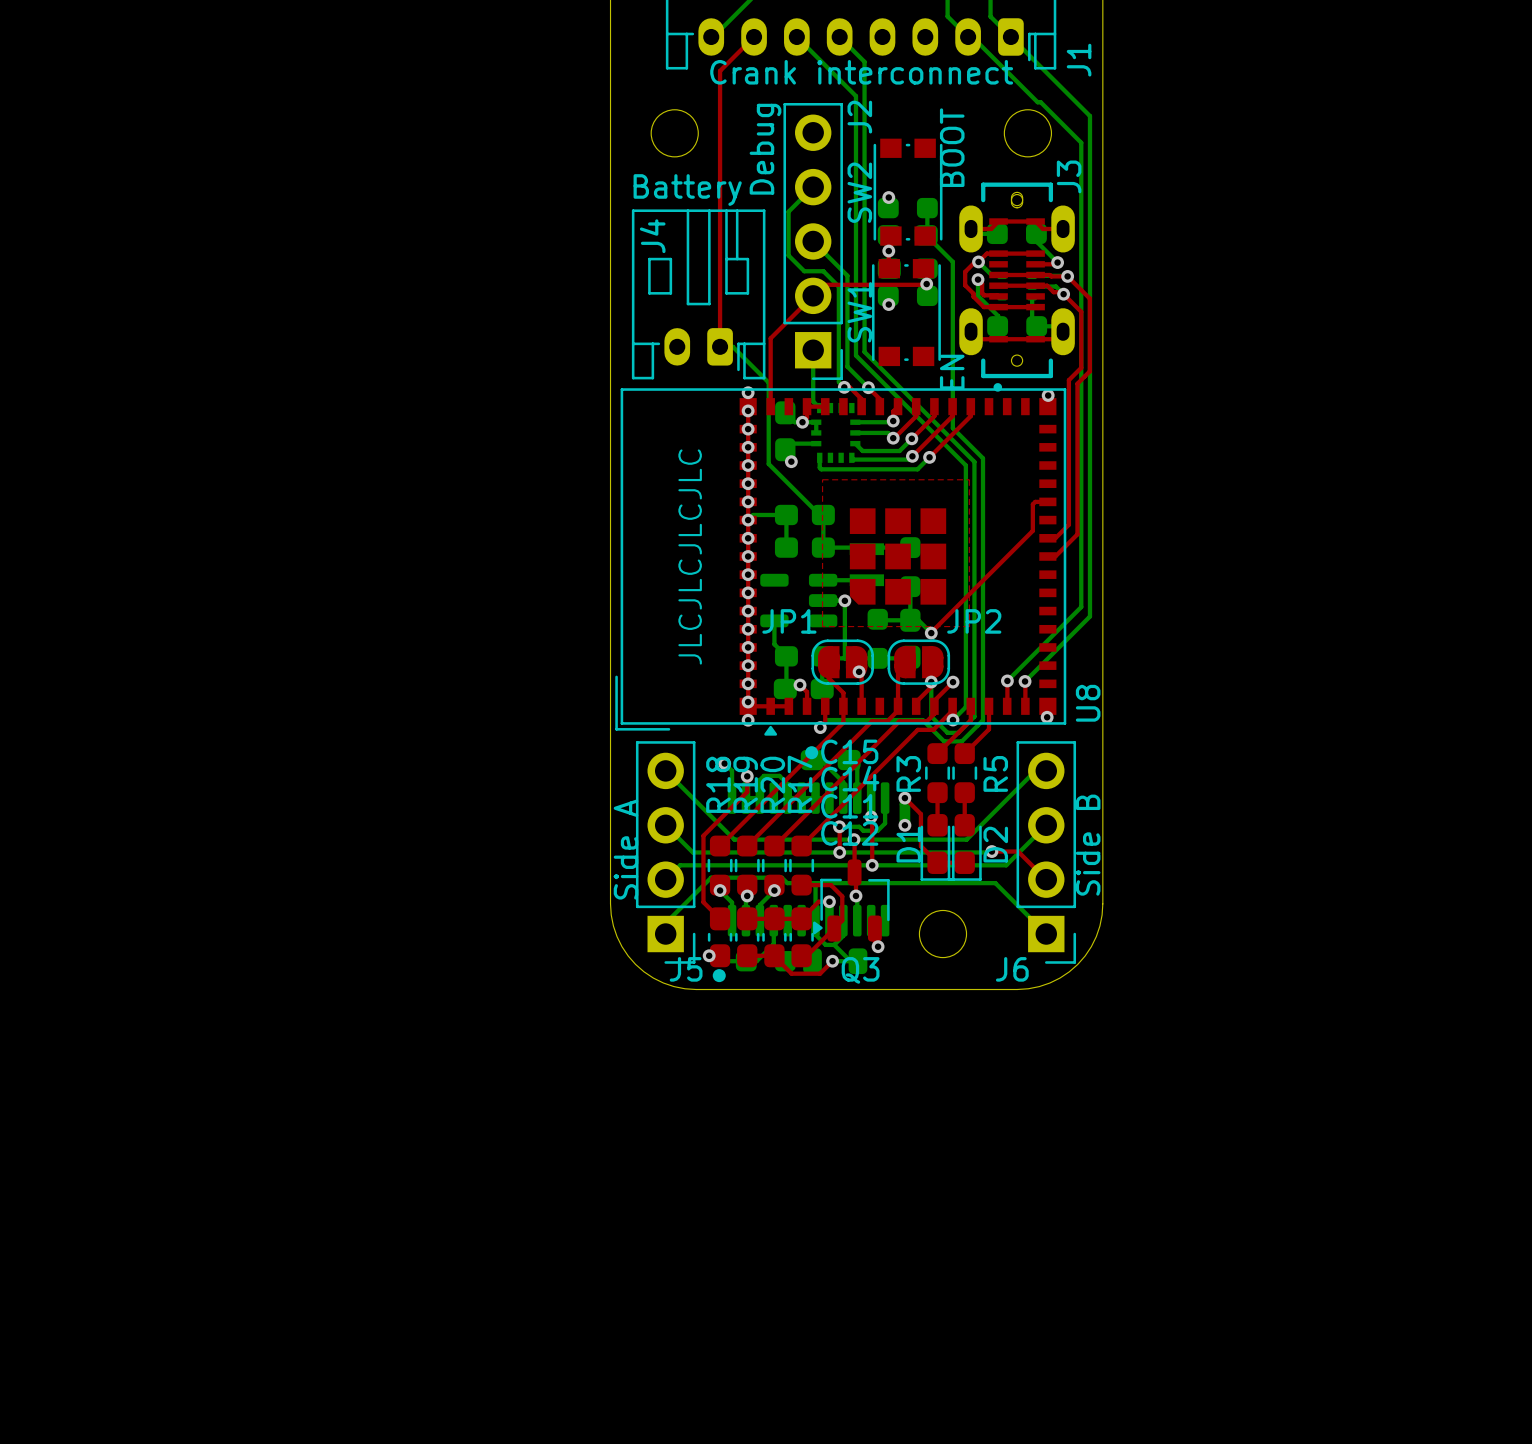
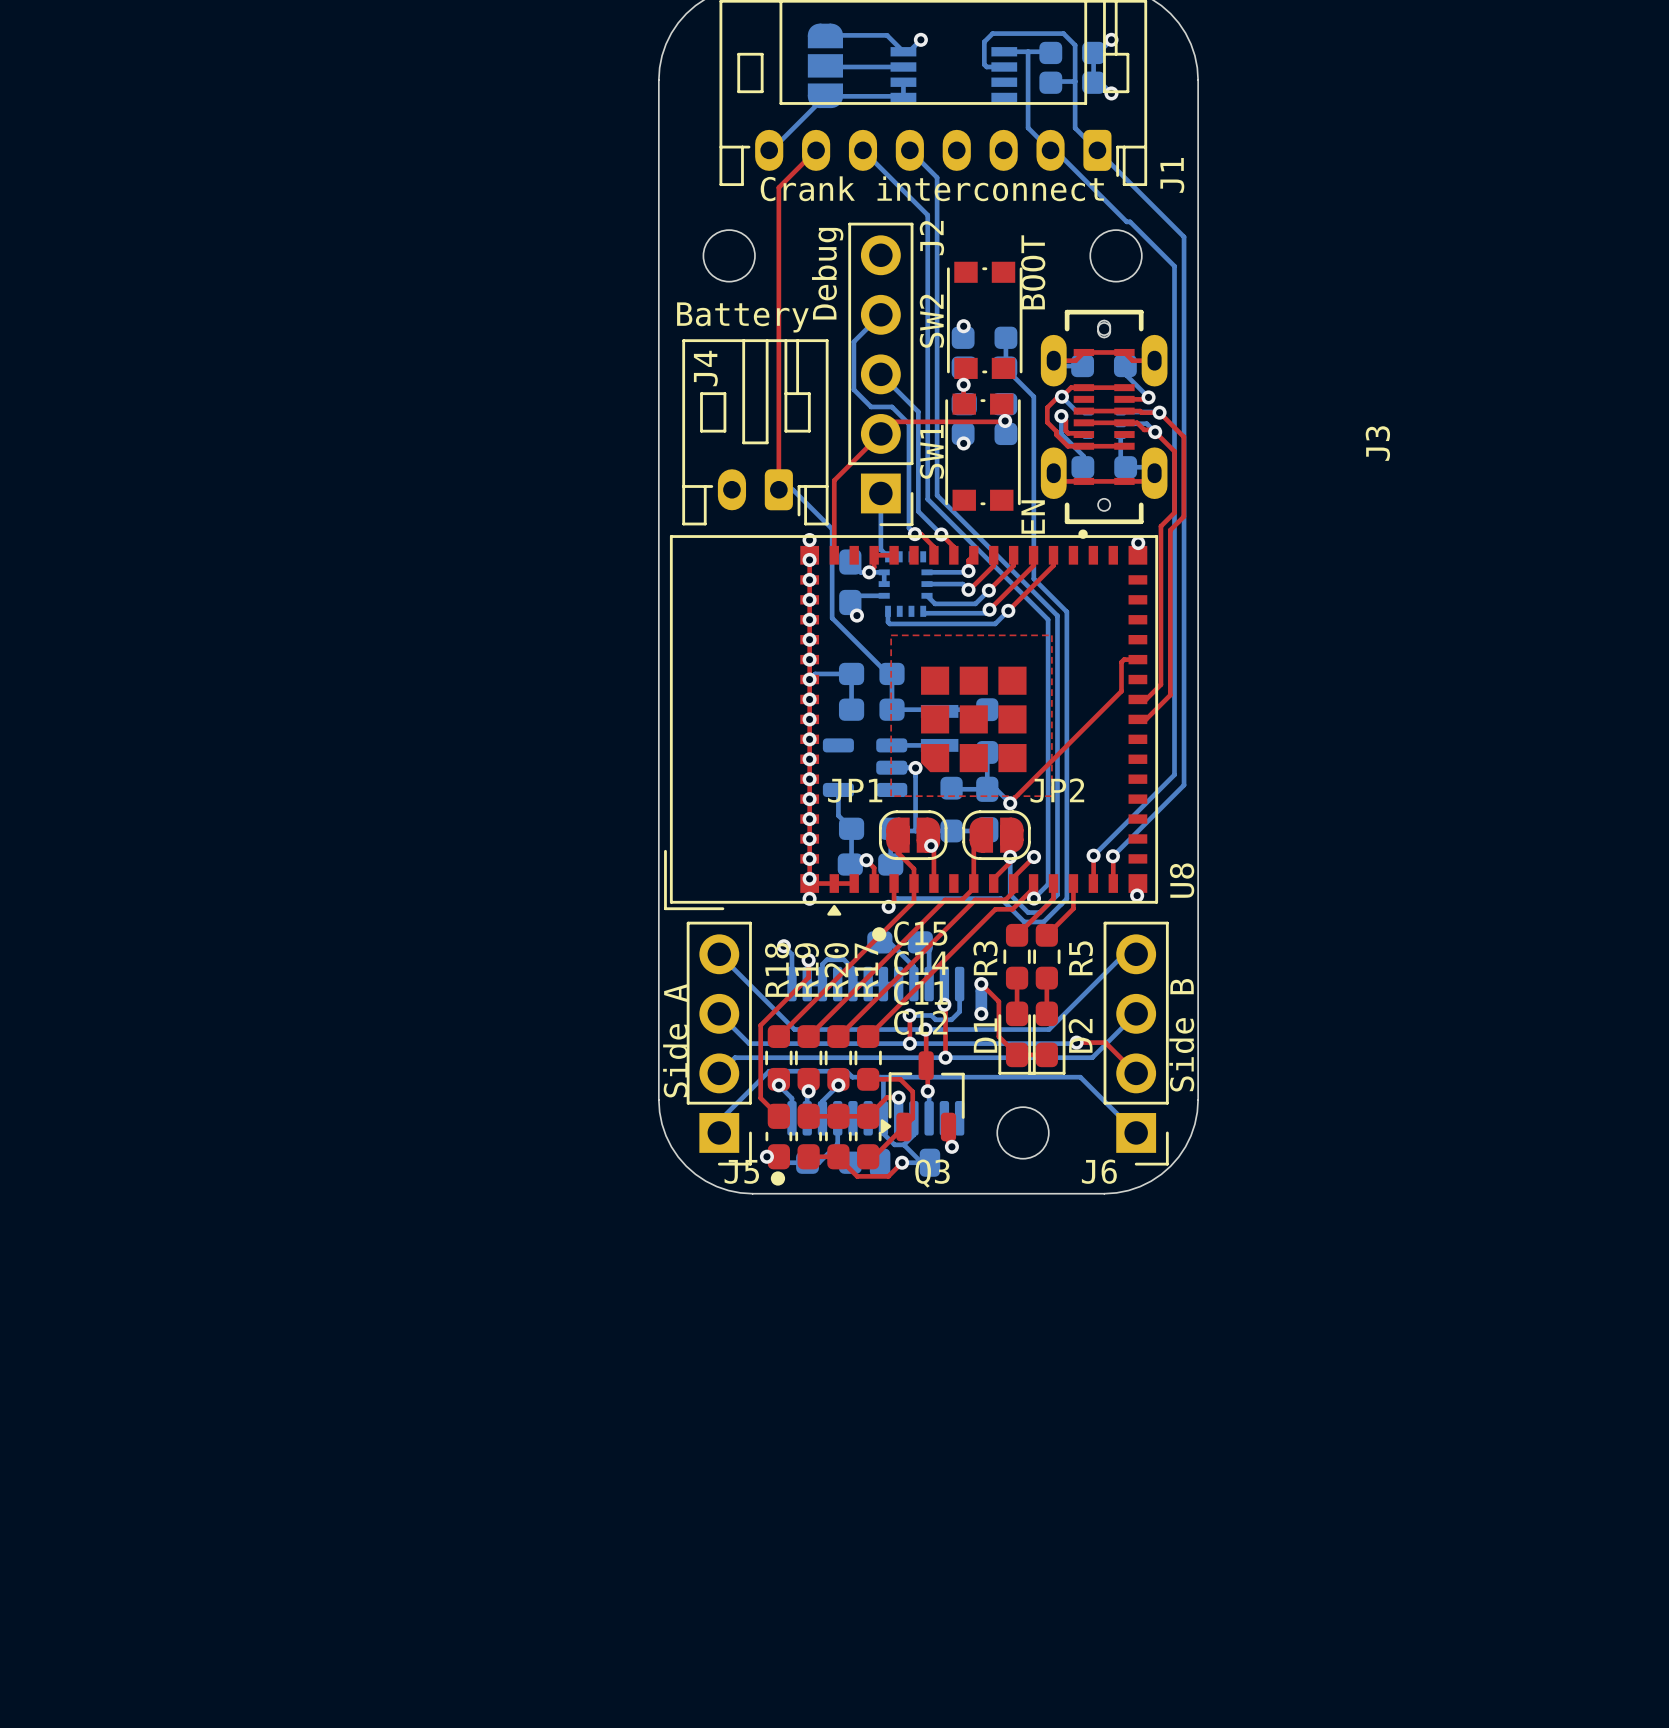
J3 name position: J3 (1069, 176) -> J3 (1377, 443)
text: JLCJLCJLCJLC (690, 556) -> none

